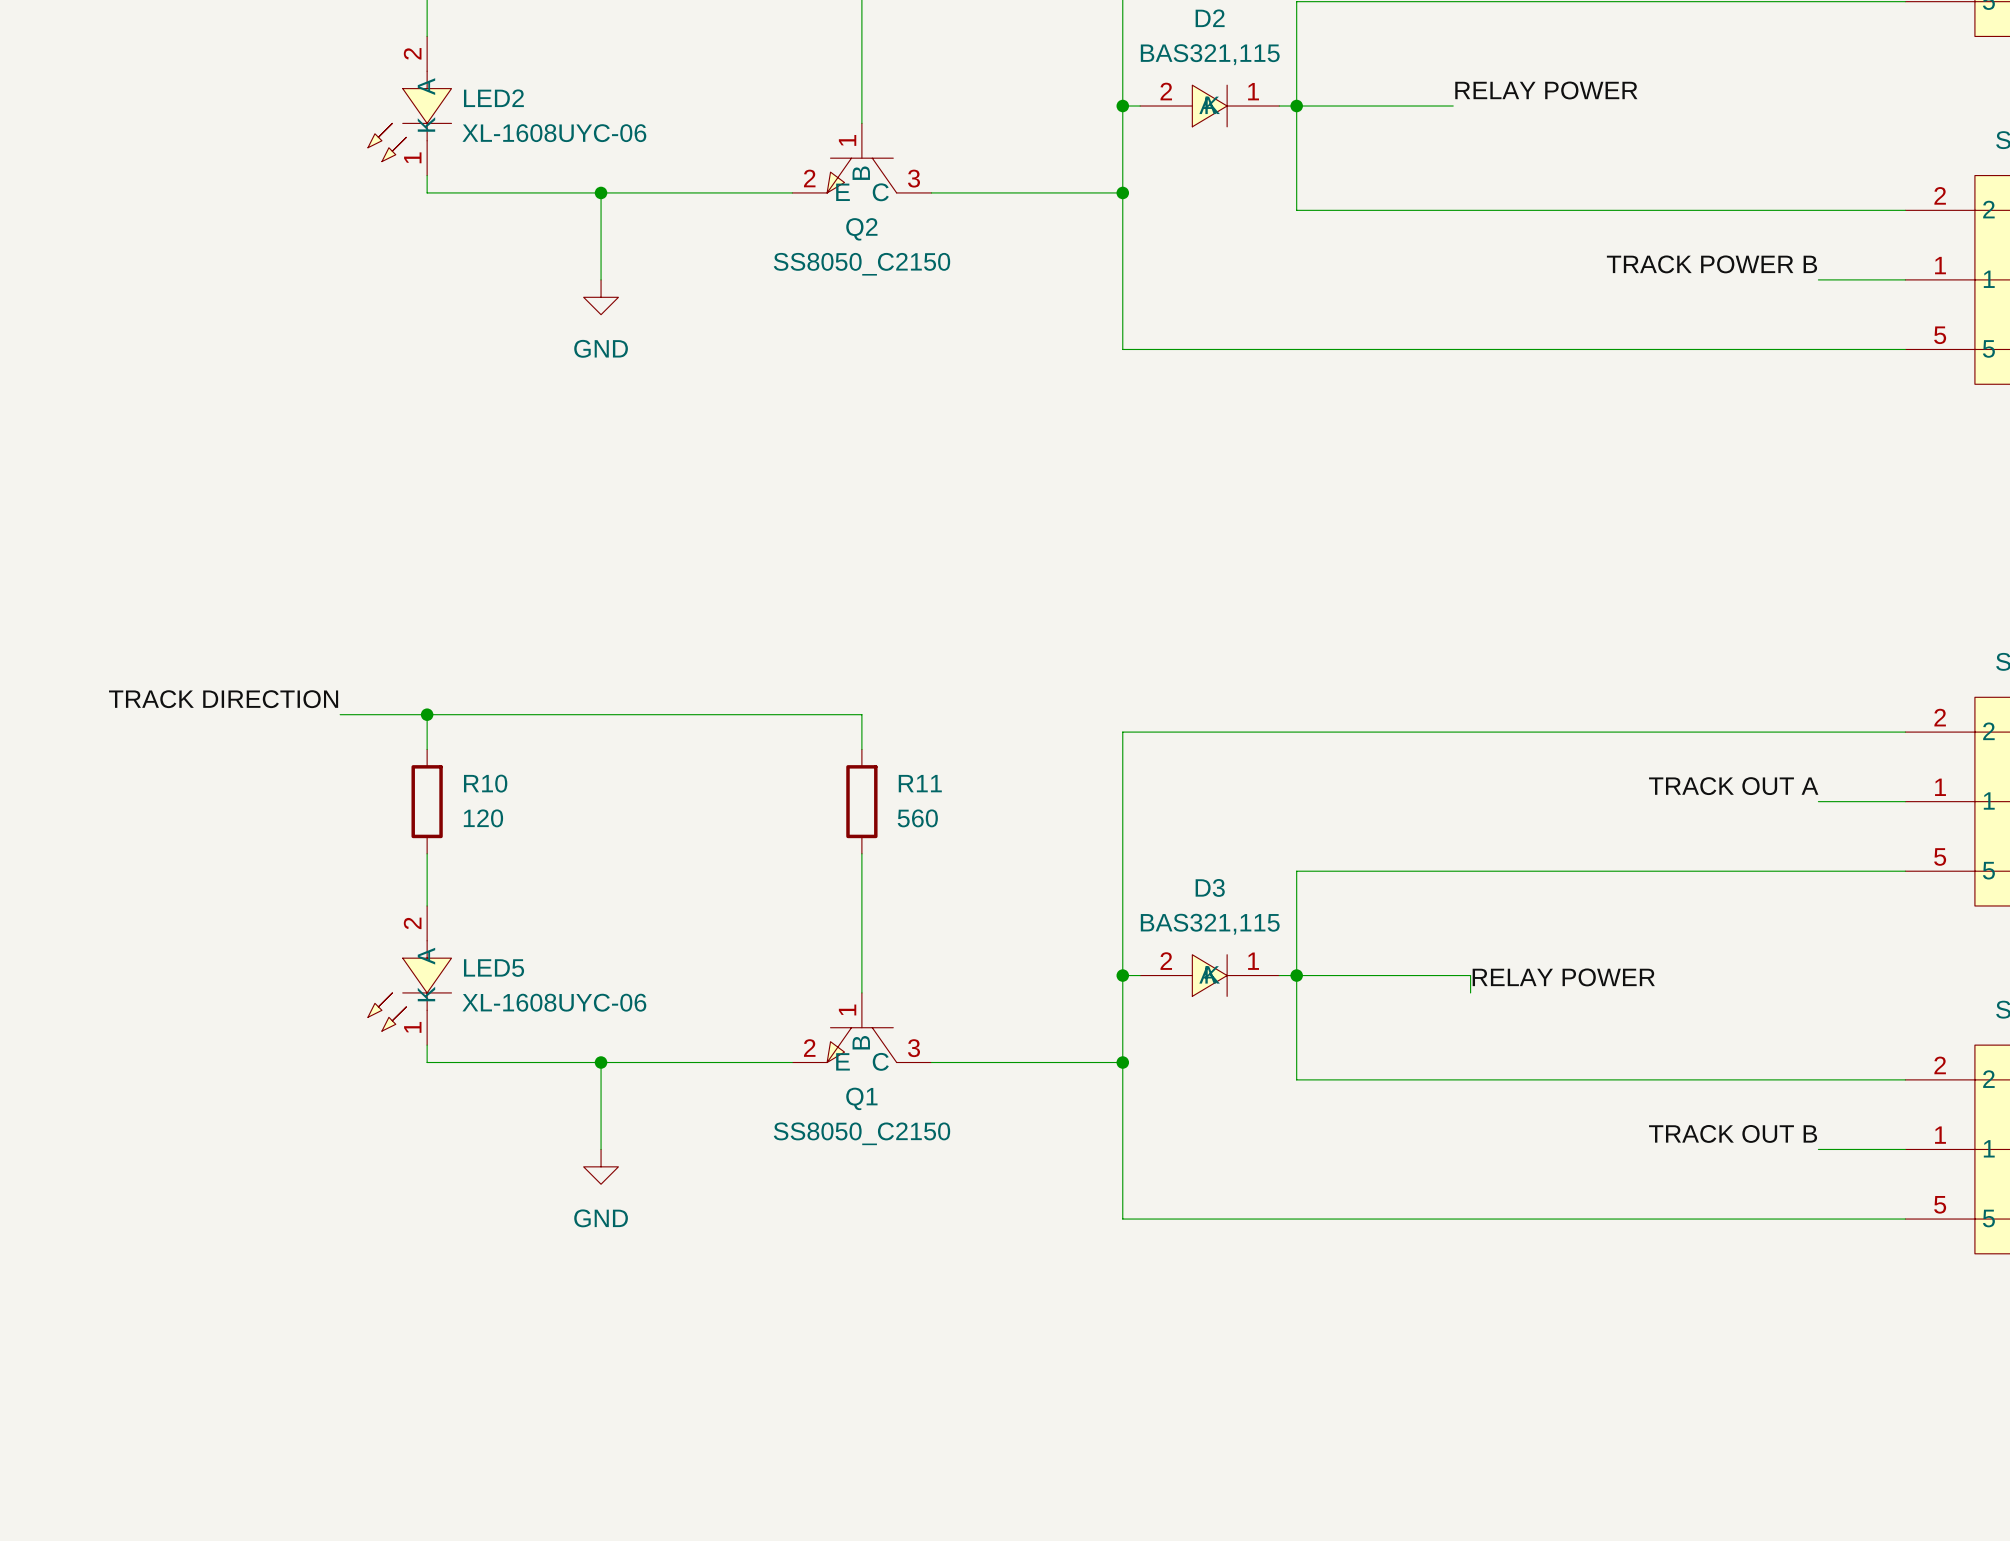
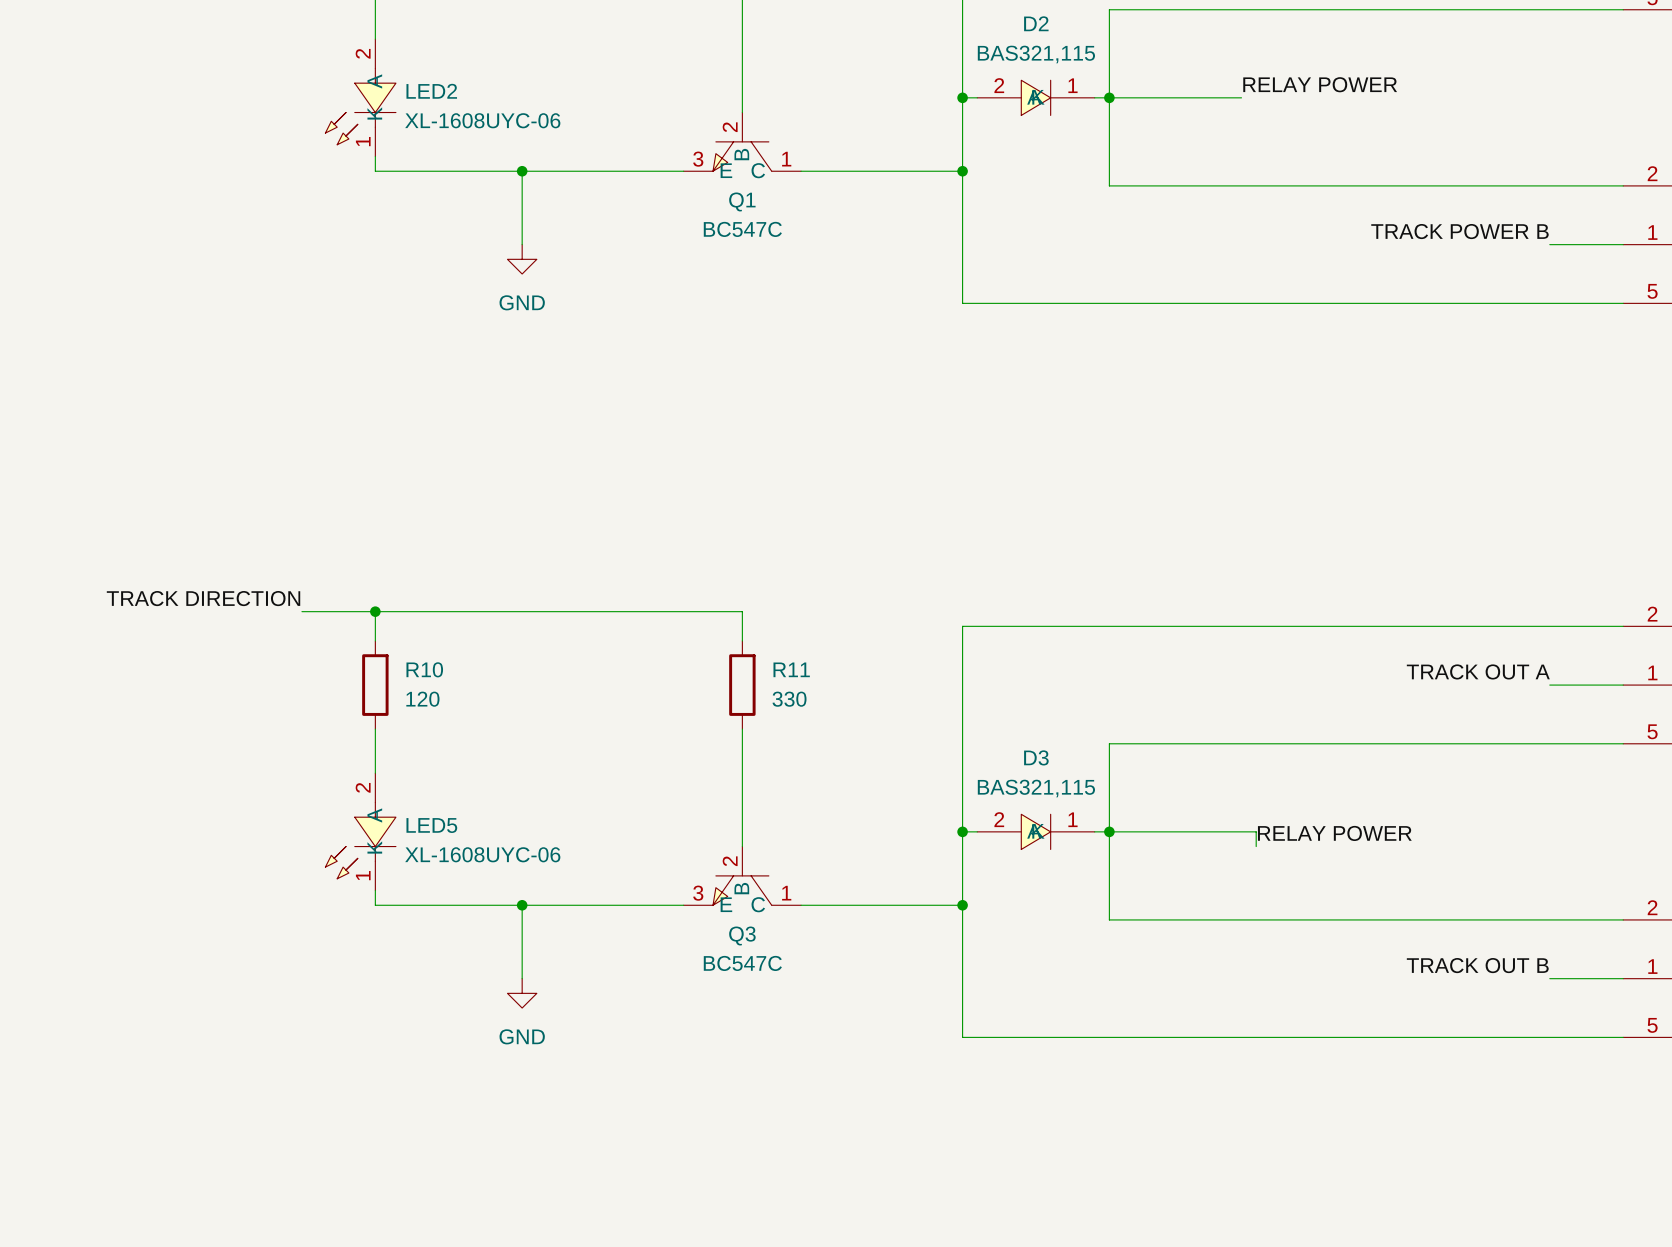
Q2: SS8050_C2150 (861, 158) -> none
R11 value: 560 (917, 818) -> 330 (789, 699)
Q1 pin number: 1 (847, 1009) -> 2 (730, 127)
Q1 position: (861, 1027) -> (742, 141)
Q3: none -> BC547C (742, 875)
Q1 pin number: 2 (809, 1048) -> 3 (698, 159)
Q1 pin number: 3 (914, 1048) -> 1 (786, 159)
Q1 value: SS8050_C2150 (861, 1133) -> BC547C (742, 229)

